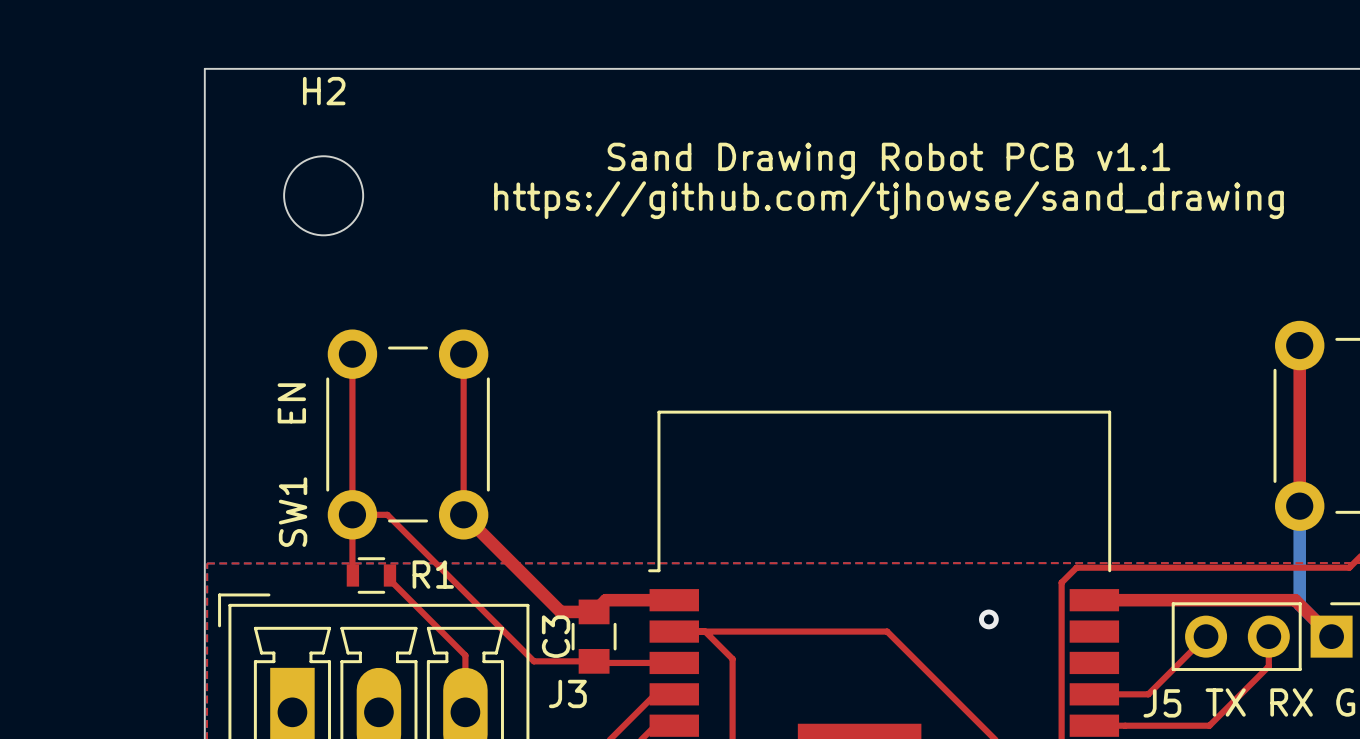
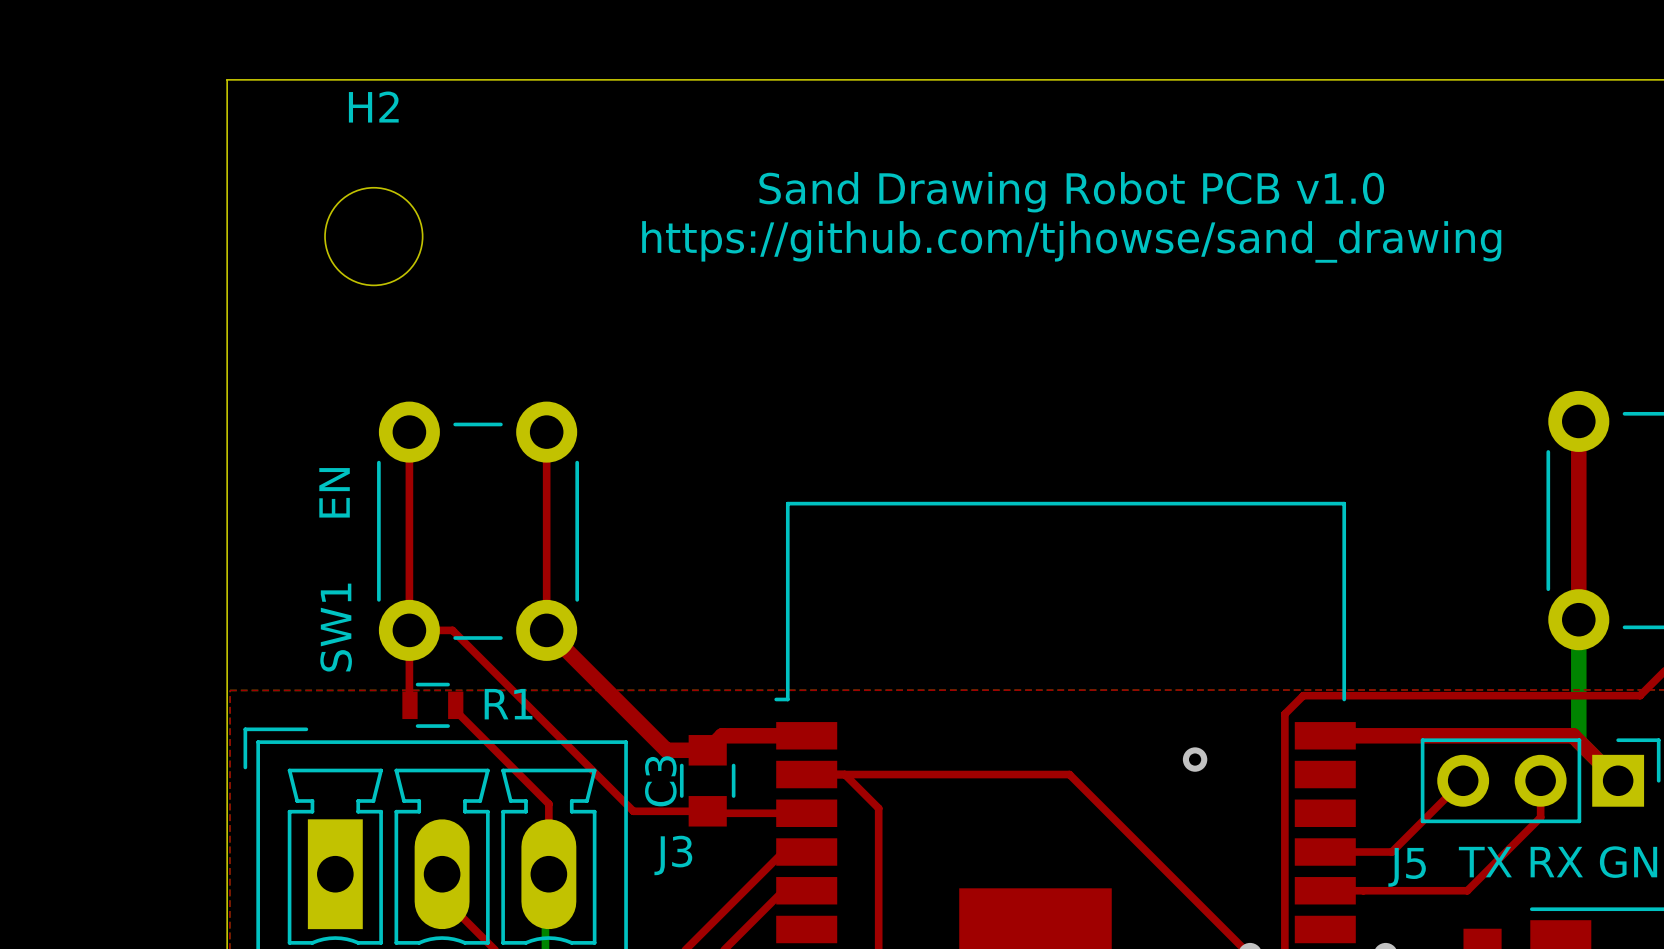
text: Sand Drawing Robot PCB v1.1 (888, 160) -> Sand Drawing Robot PCB v1.0 (1071, 192)

